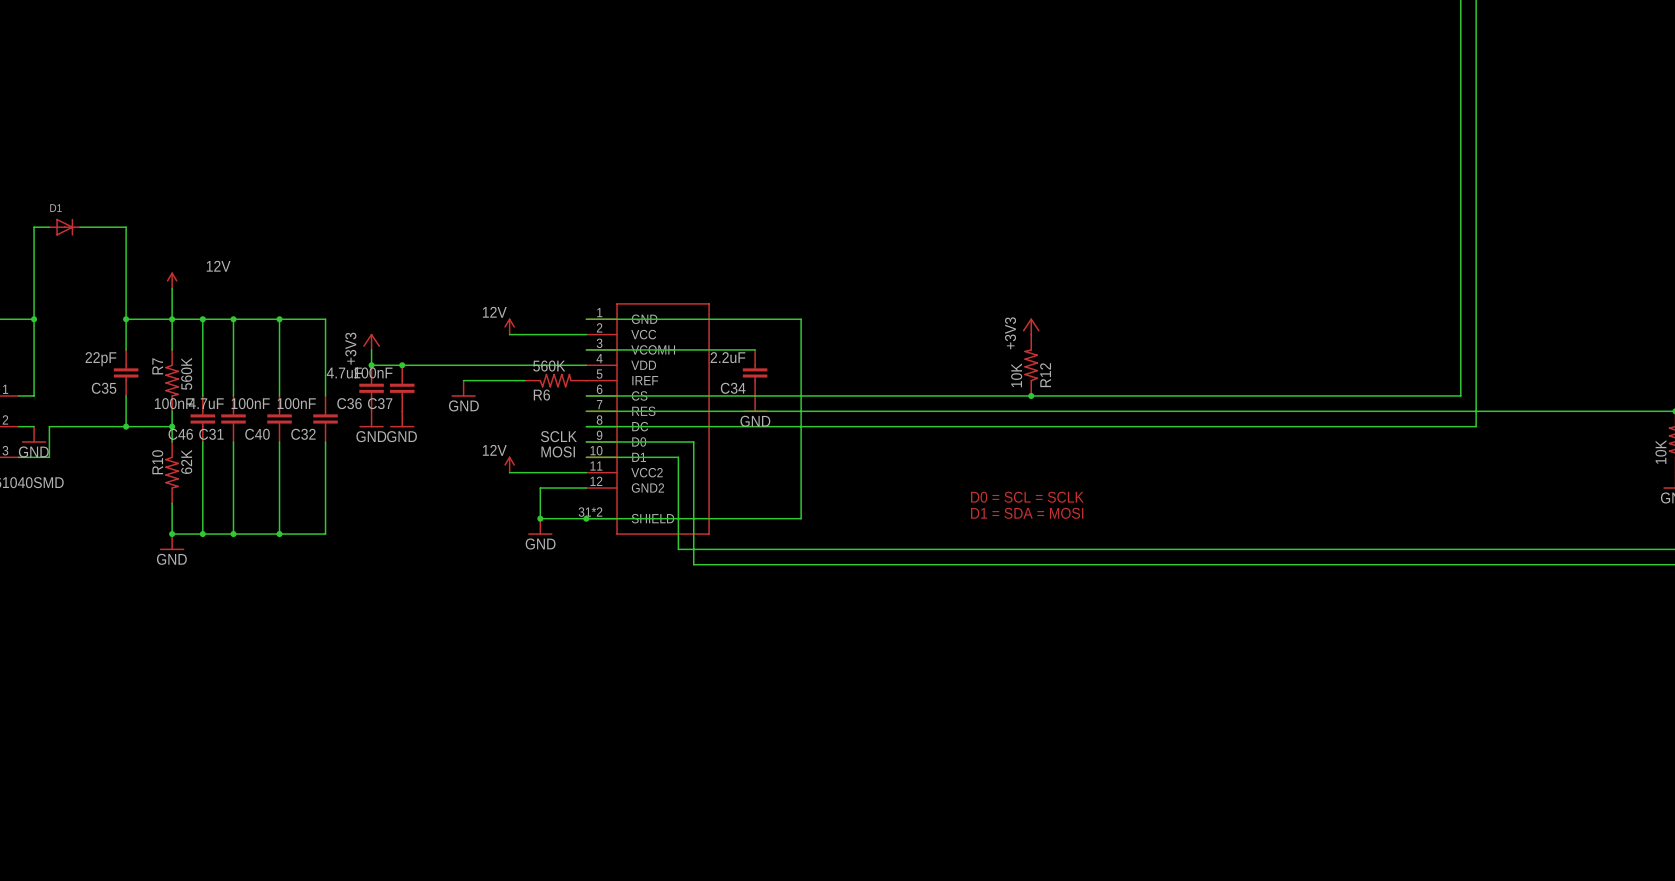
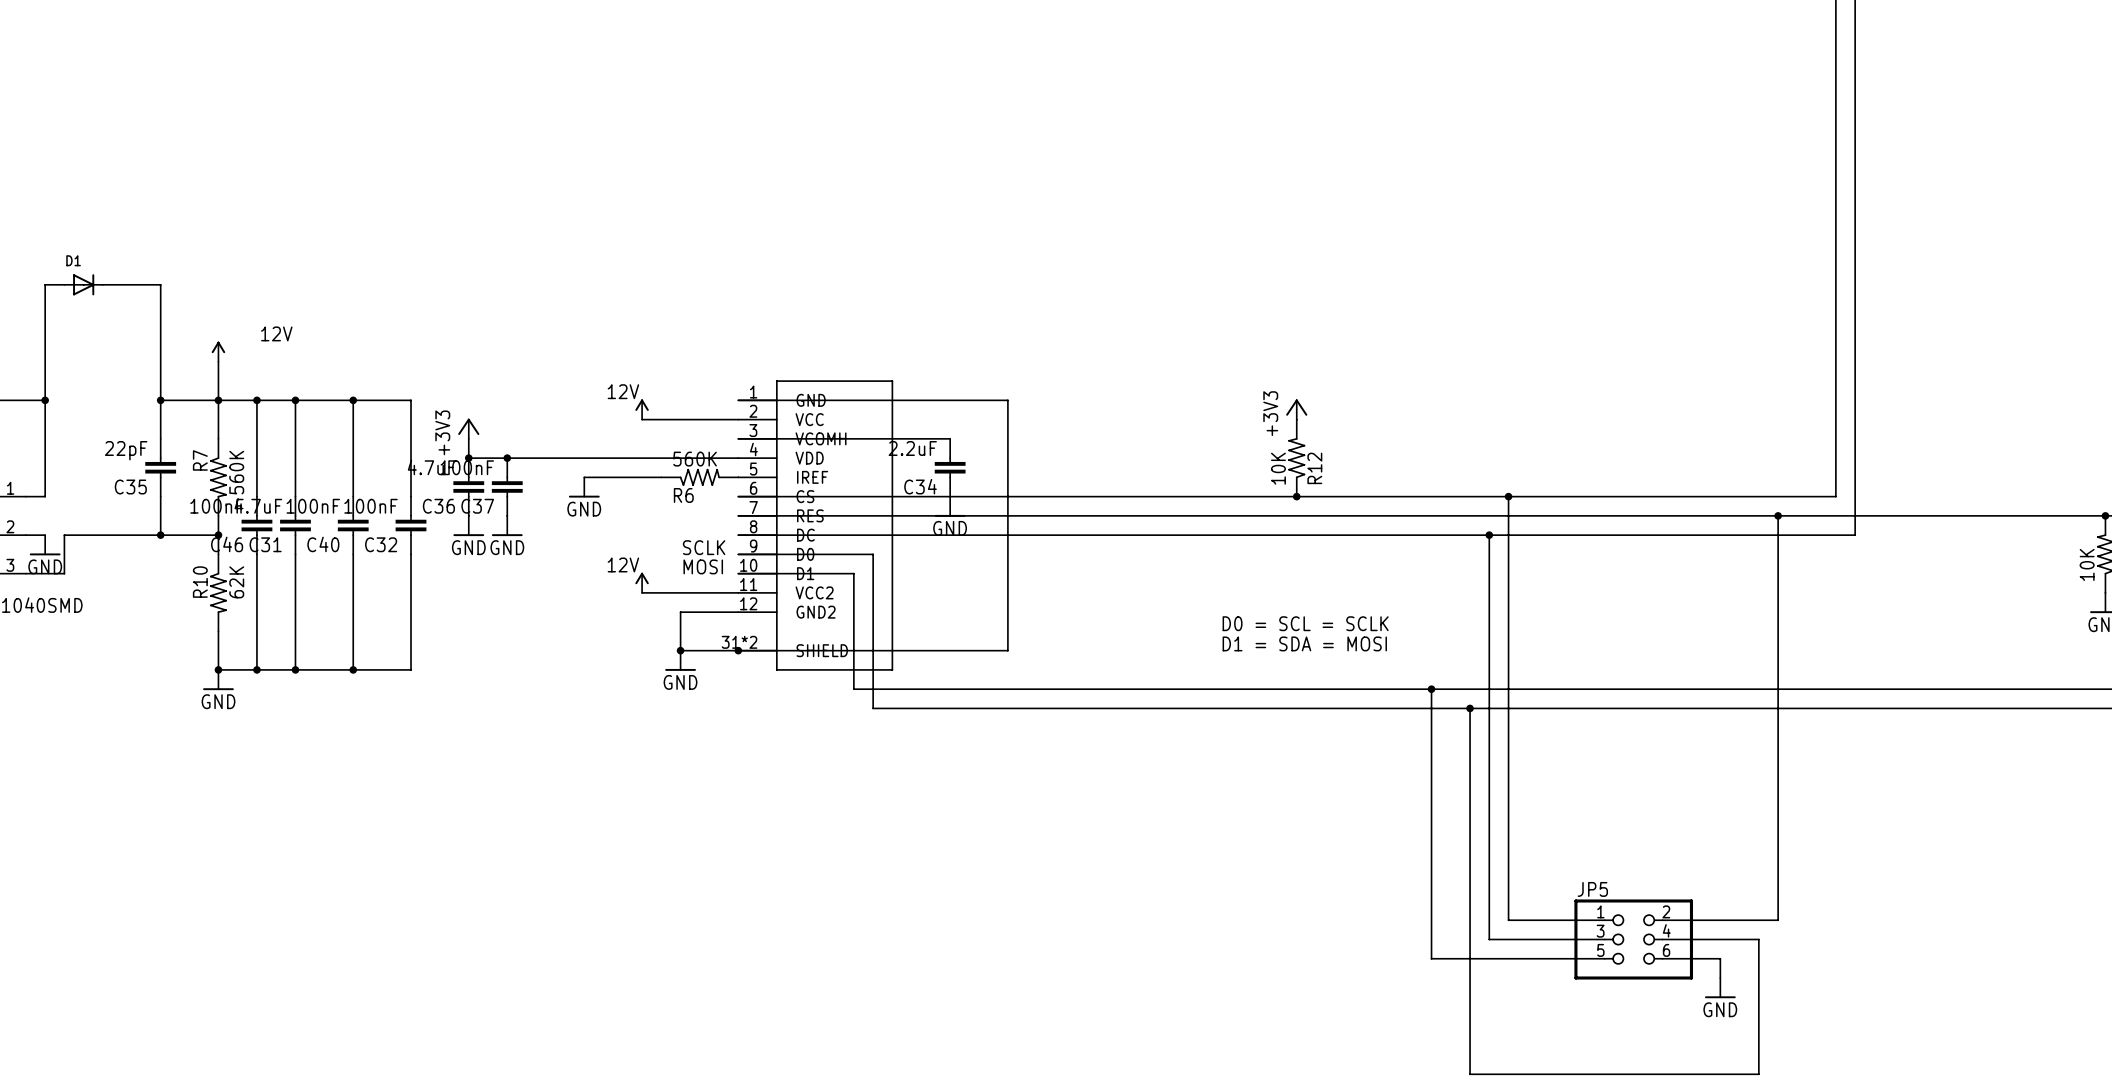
wire: none -> (1508, 496) (1508, 920) (1604, 920)
junction: none -> (1508, 496)
wire: none -> (1778, 515) (1778, 920) (1662, 920)
junction: none -> (1778, 515)
wire: none -> (1489, 535) (1489, 939) (1604, 939)
junction: none -> (1489, 535)
wire: none -> (1431, 689) (1431, 958) (1604, 958)
junction: none -> (1431, 689)
wire: none -> (1470, 708) (1470, 1074) (1758, 1074) (1758, 939) (1662, 939)
junction: none -> (1470, 708)
JP5: none -> (1633, 939)
wire: none -> (1662, 958) (1720, 958) (1720, 978)
power symbol: none -> GND (1720, 988)

